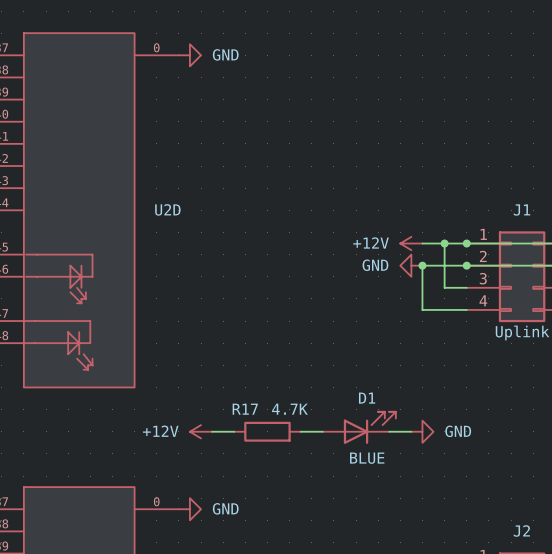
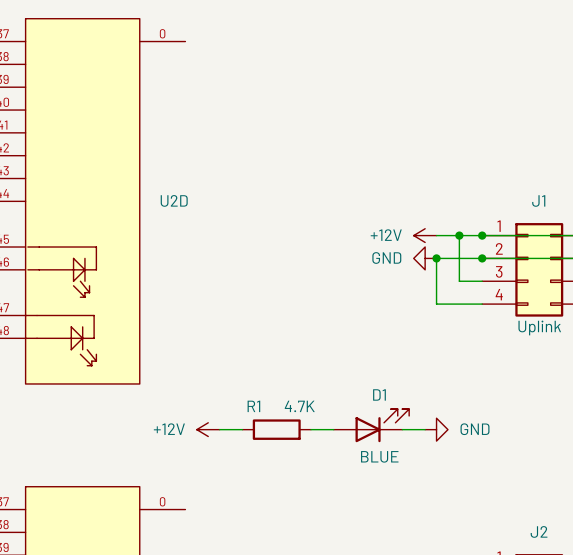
power symbol: GND (189, 55) -> none
R17 name: R17 (245, 409) -> R1 (253, 406)
power symbol: GND (189, 509) -> none

